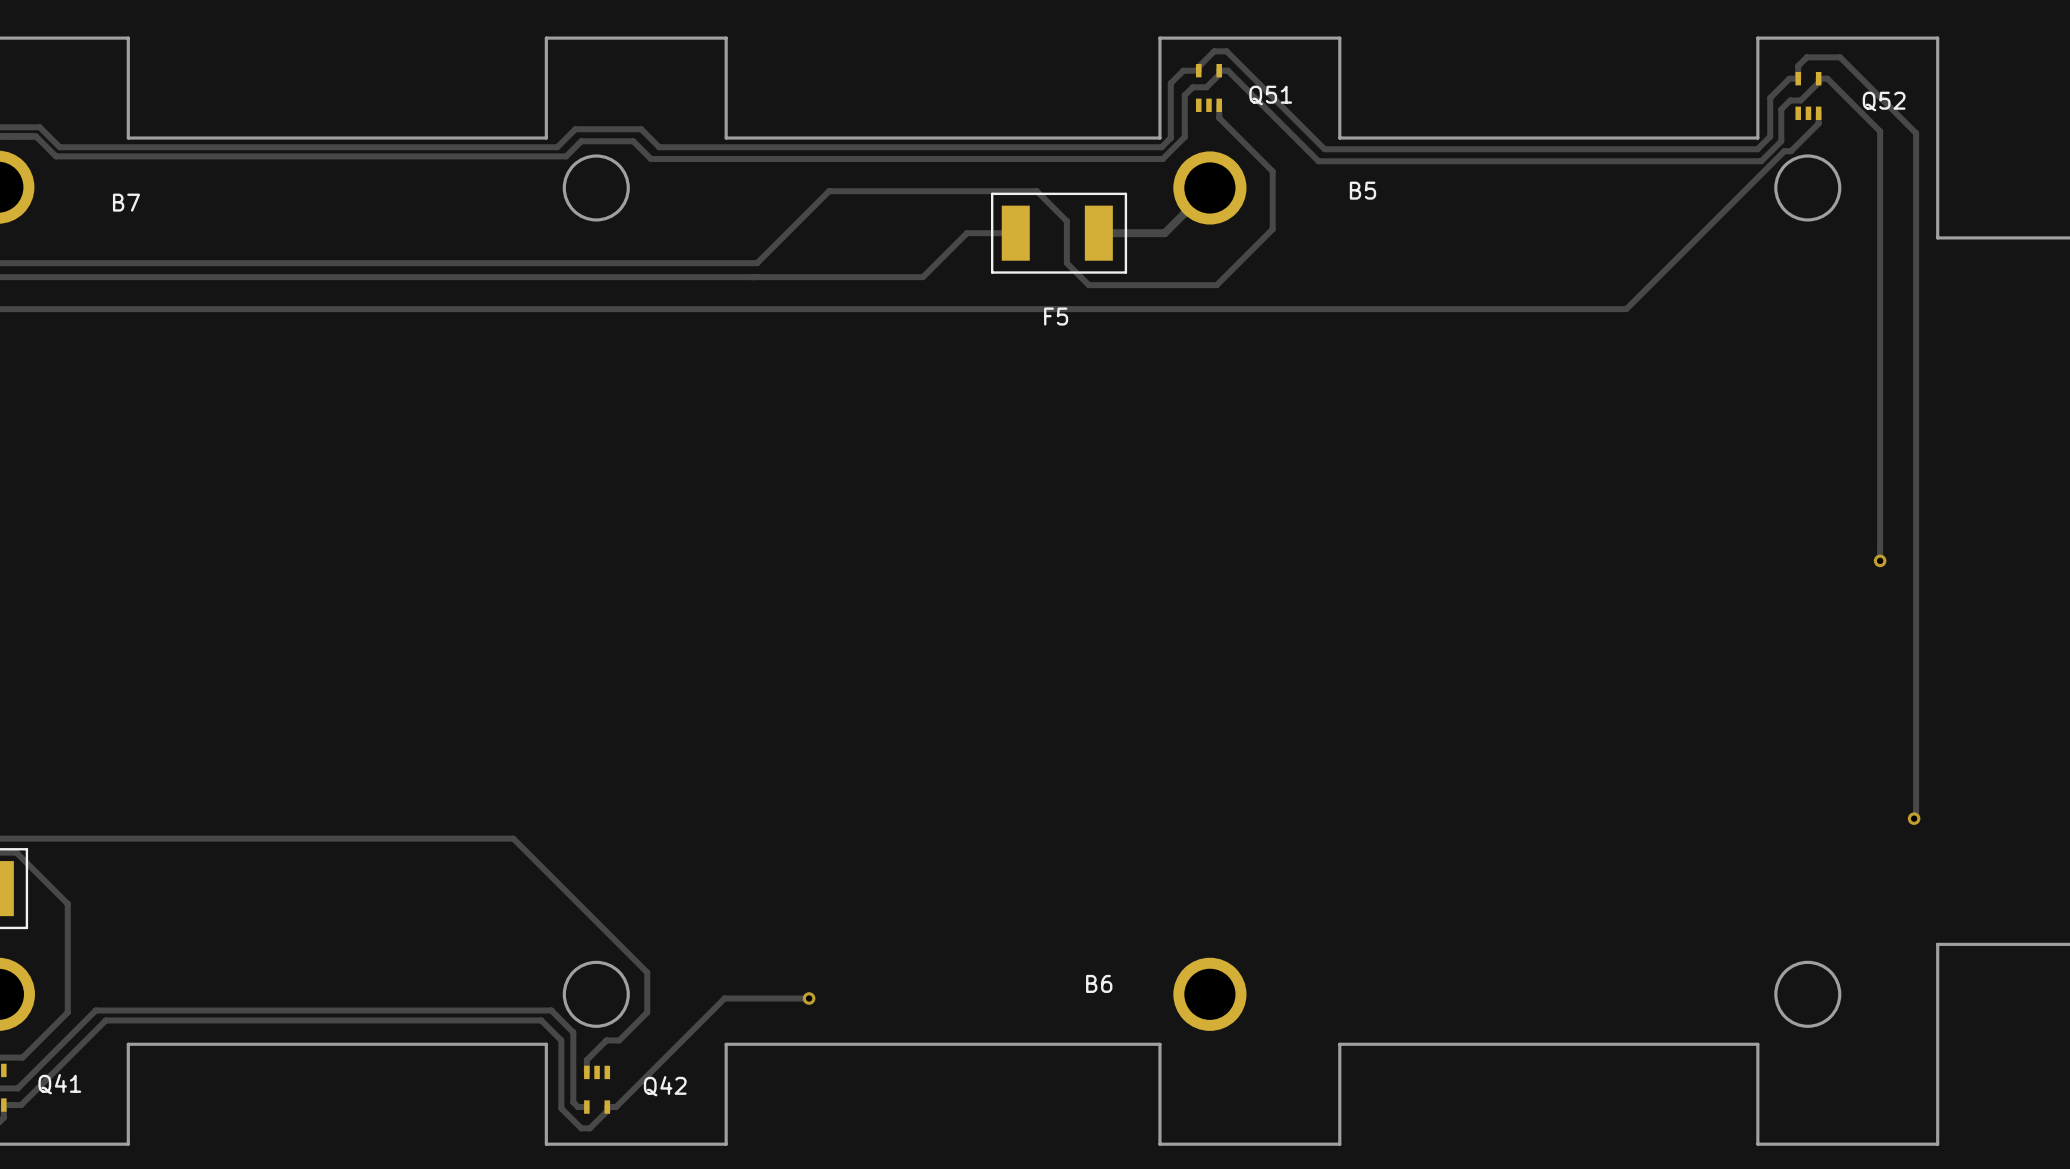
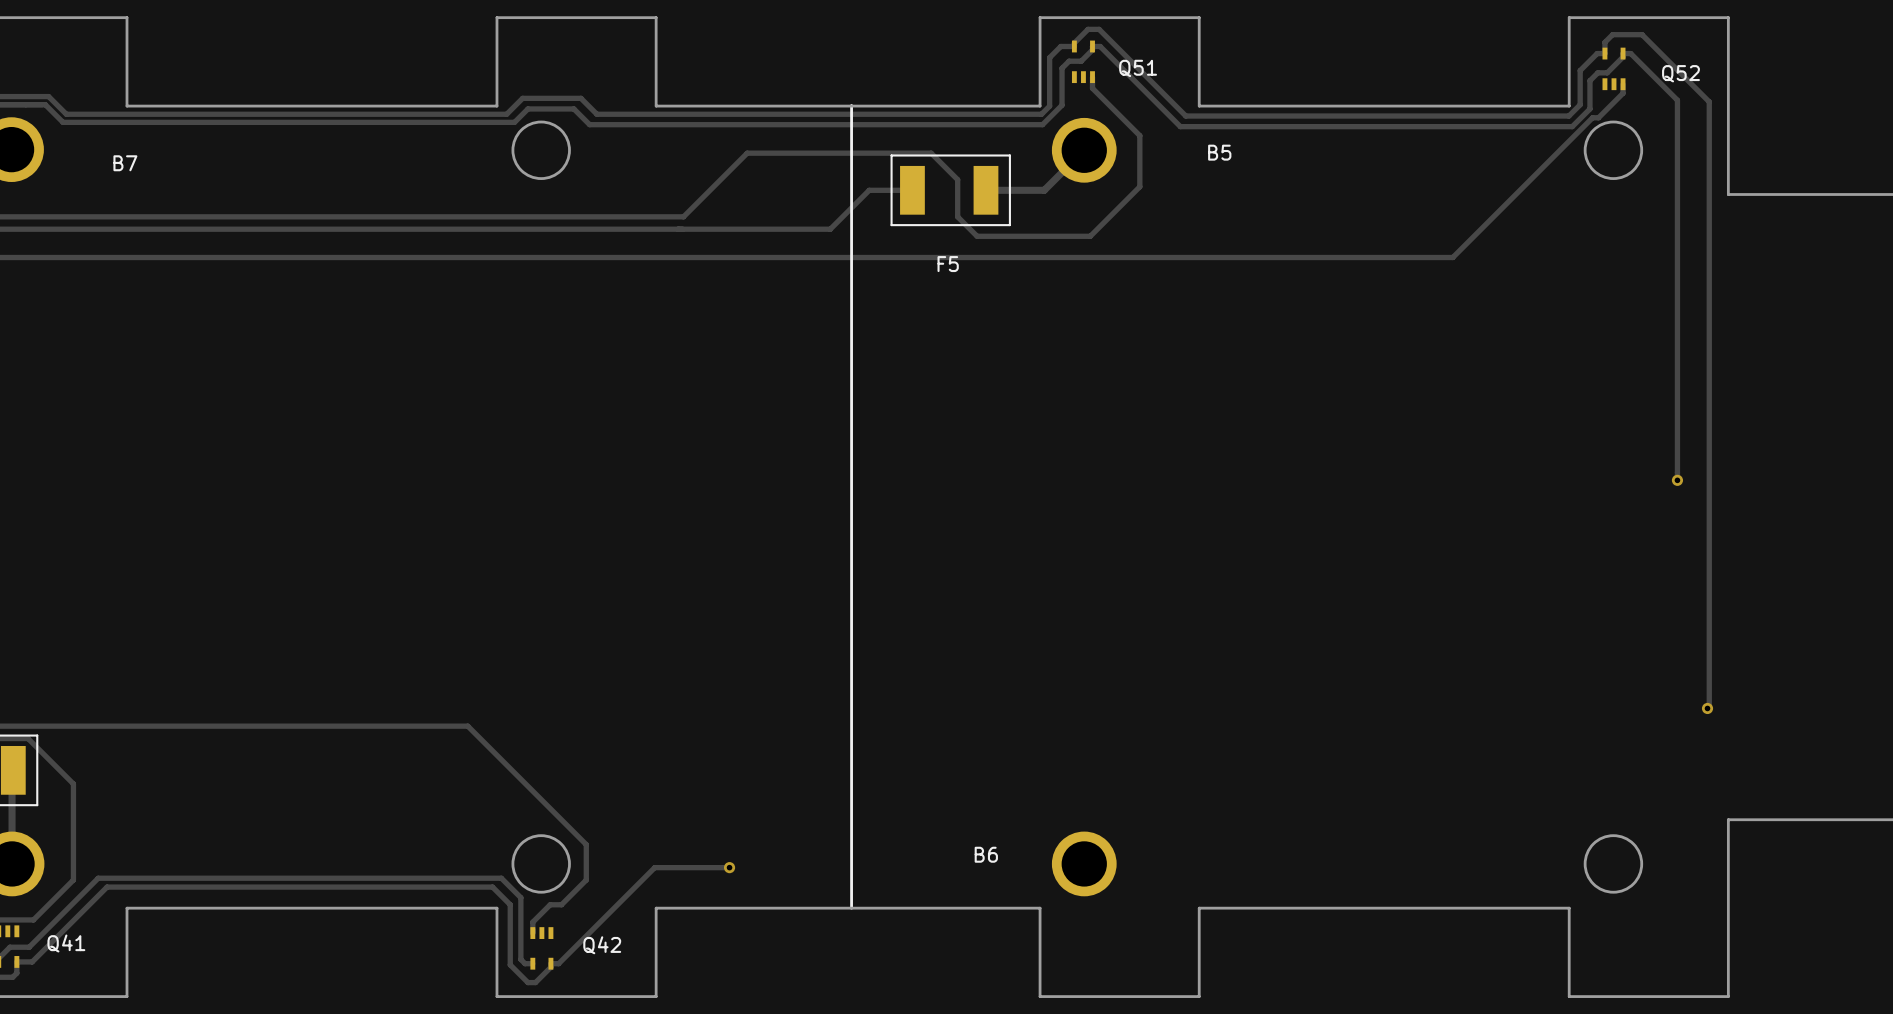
line: none -> (851, 105) (851, 908)

